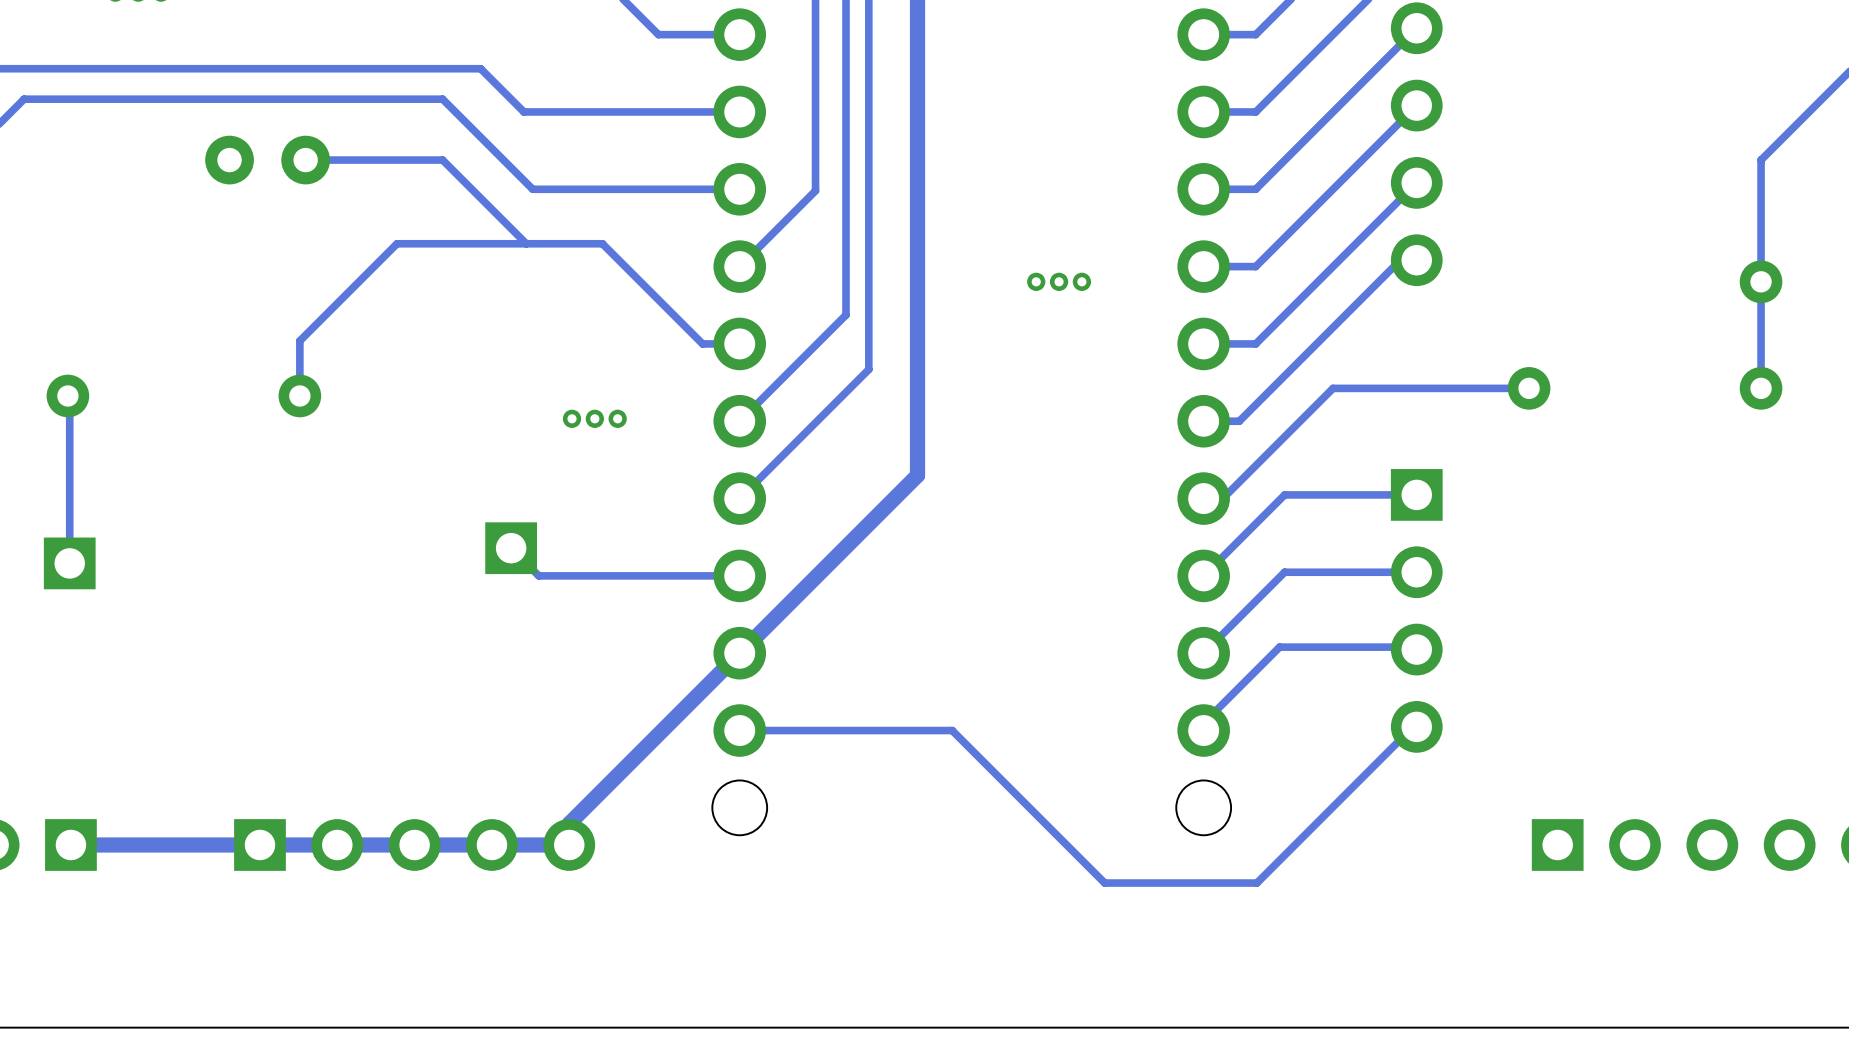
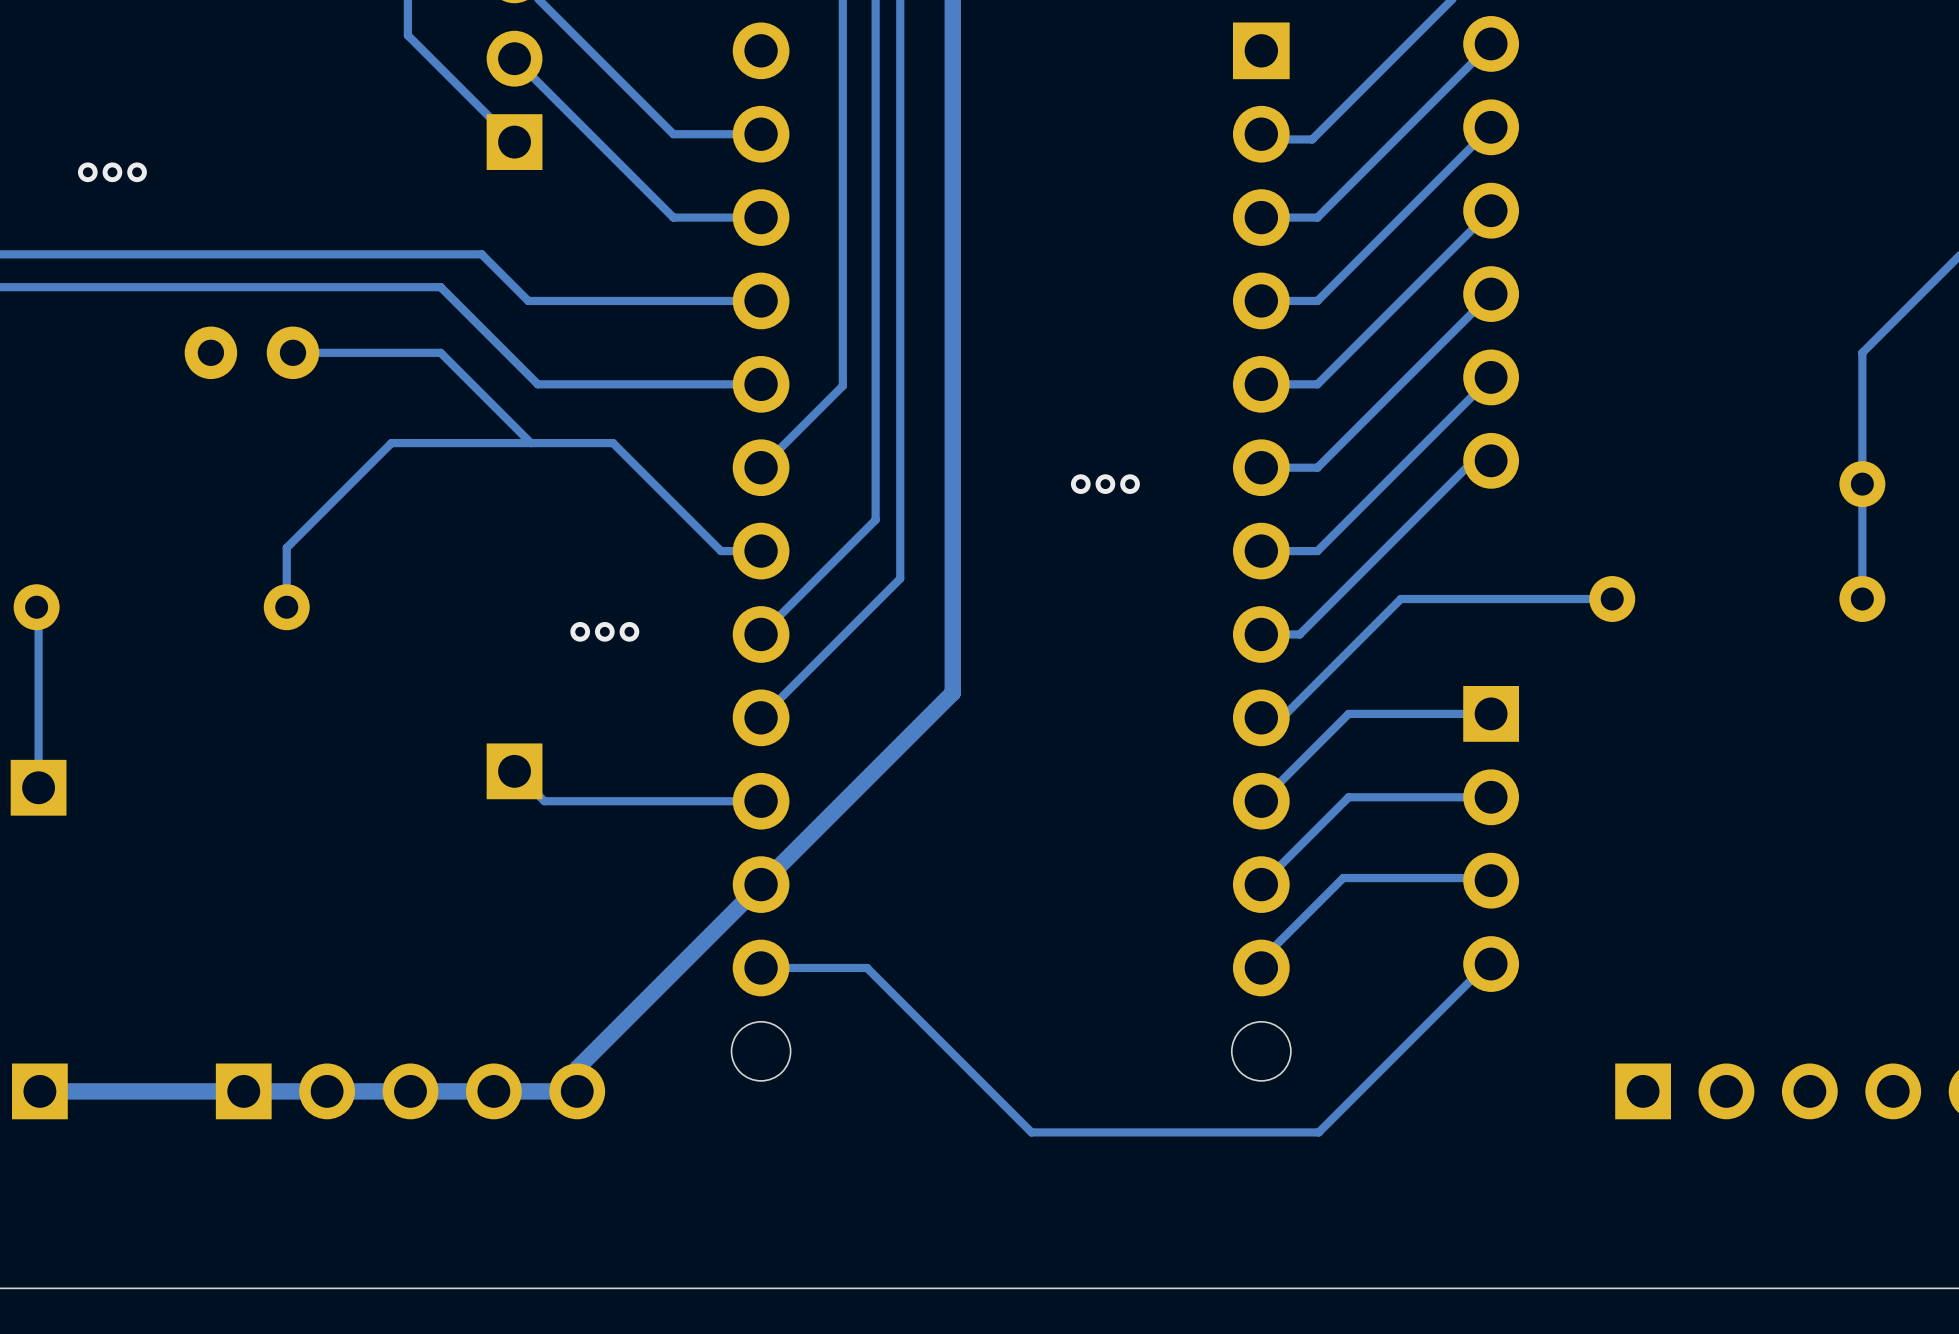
track: (838, 730) (952, 730) (1104, 883) -> (867, 967) (1031, 1132) (1154, 1132)

